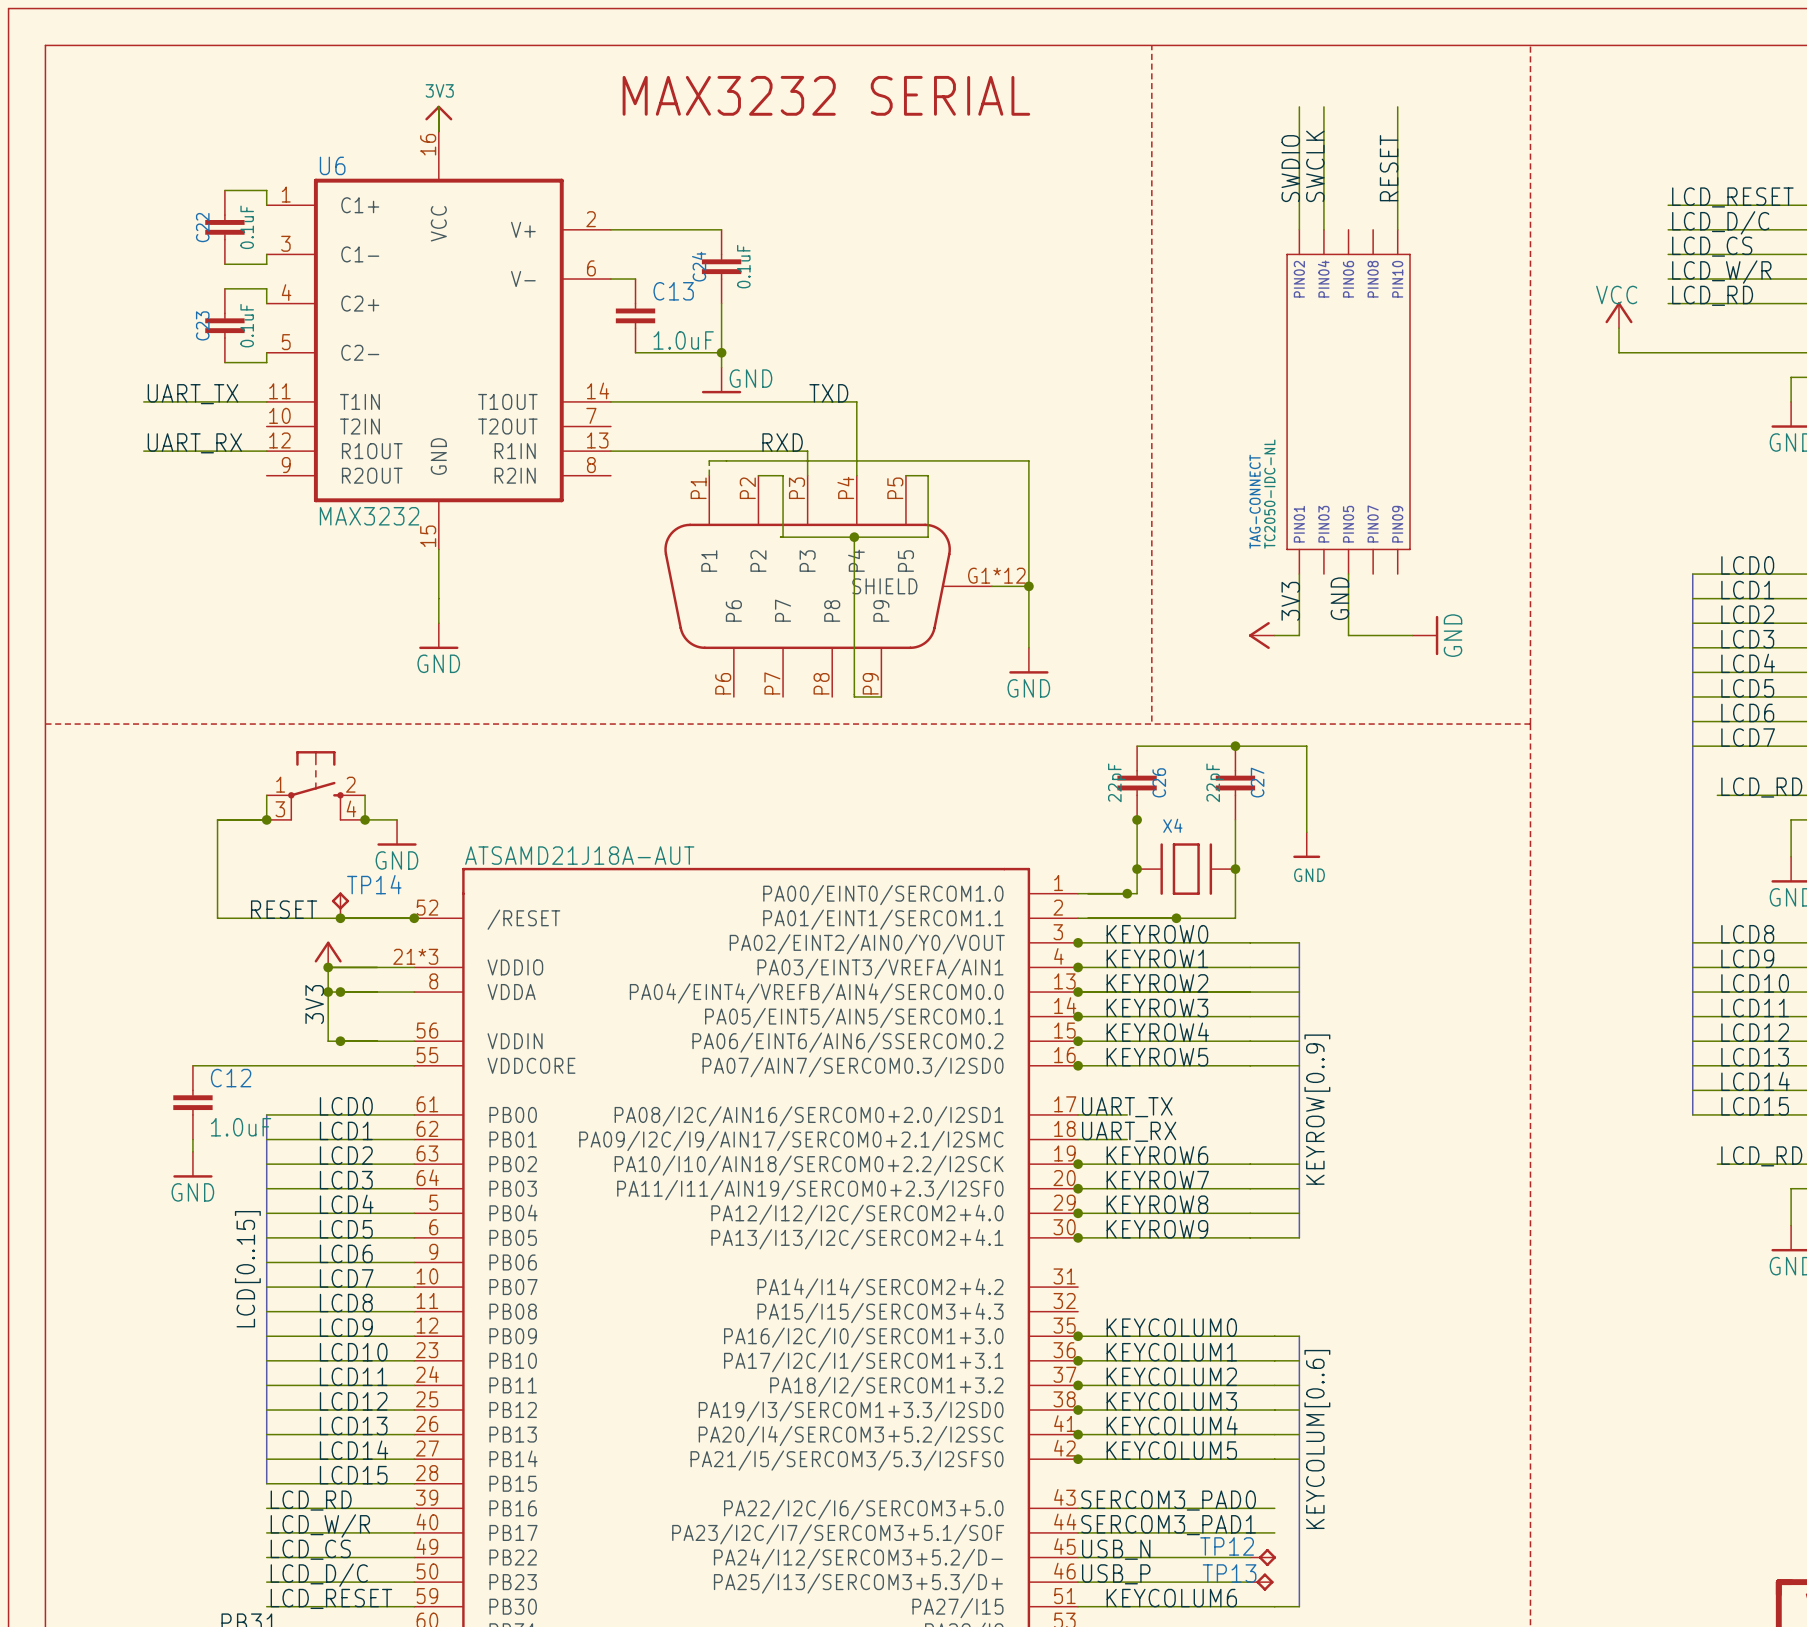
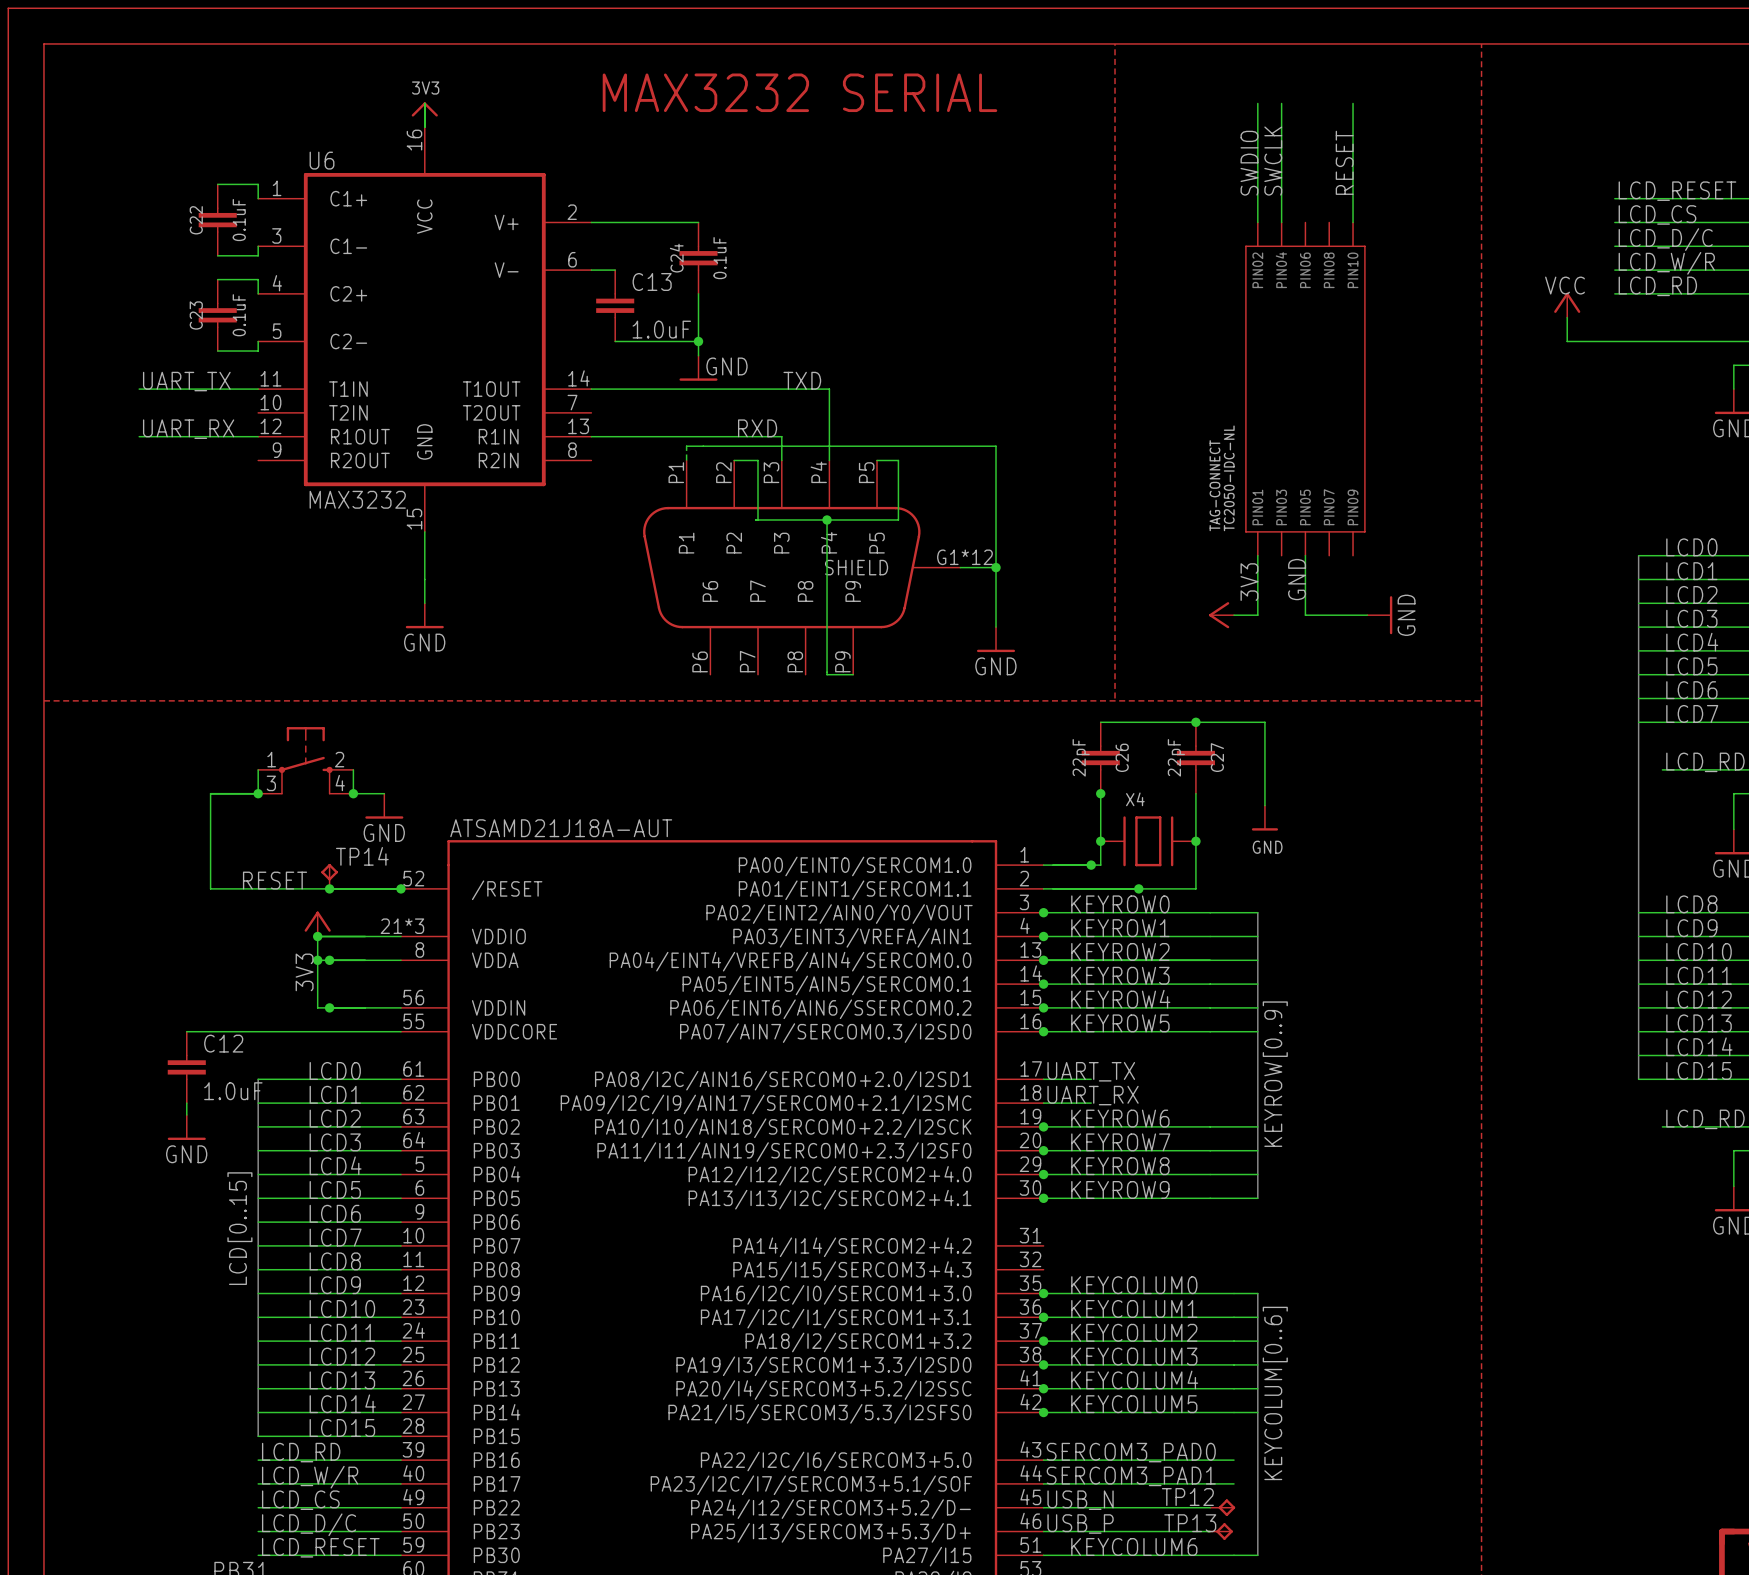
label: LCD_D/C (1720, 222) -> LCD_CS (1657, 214)
label: LCD_CS (1712, 246) -> LCD_D/C (1665, 239)

